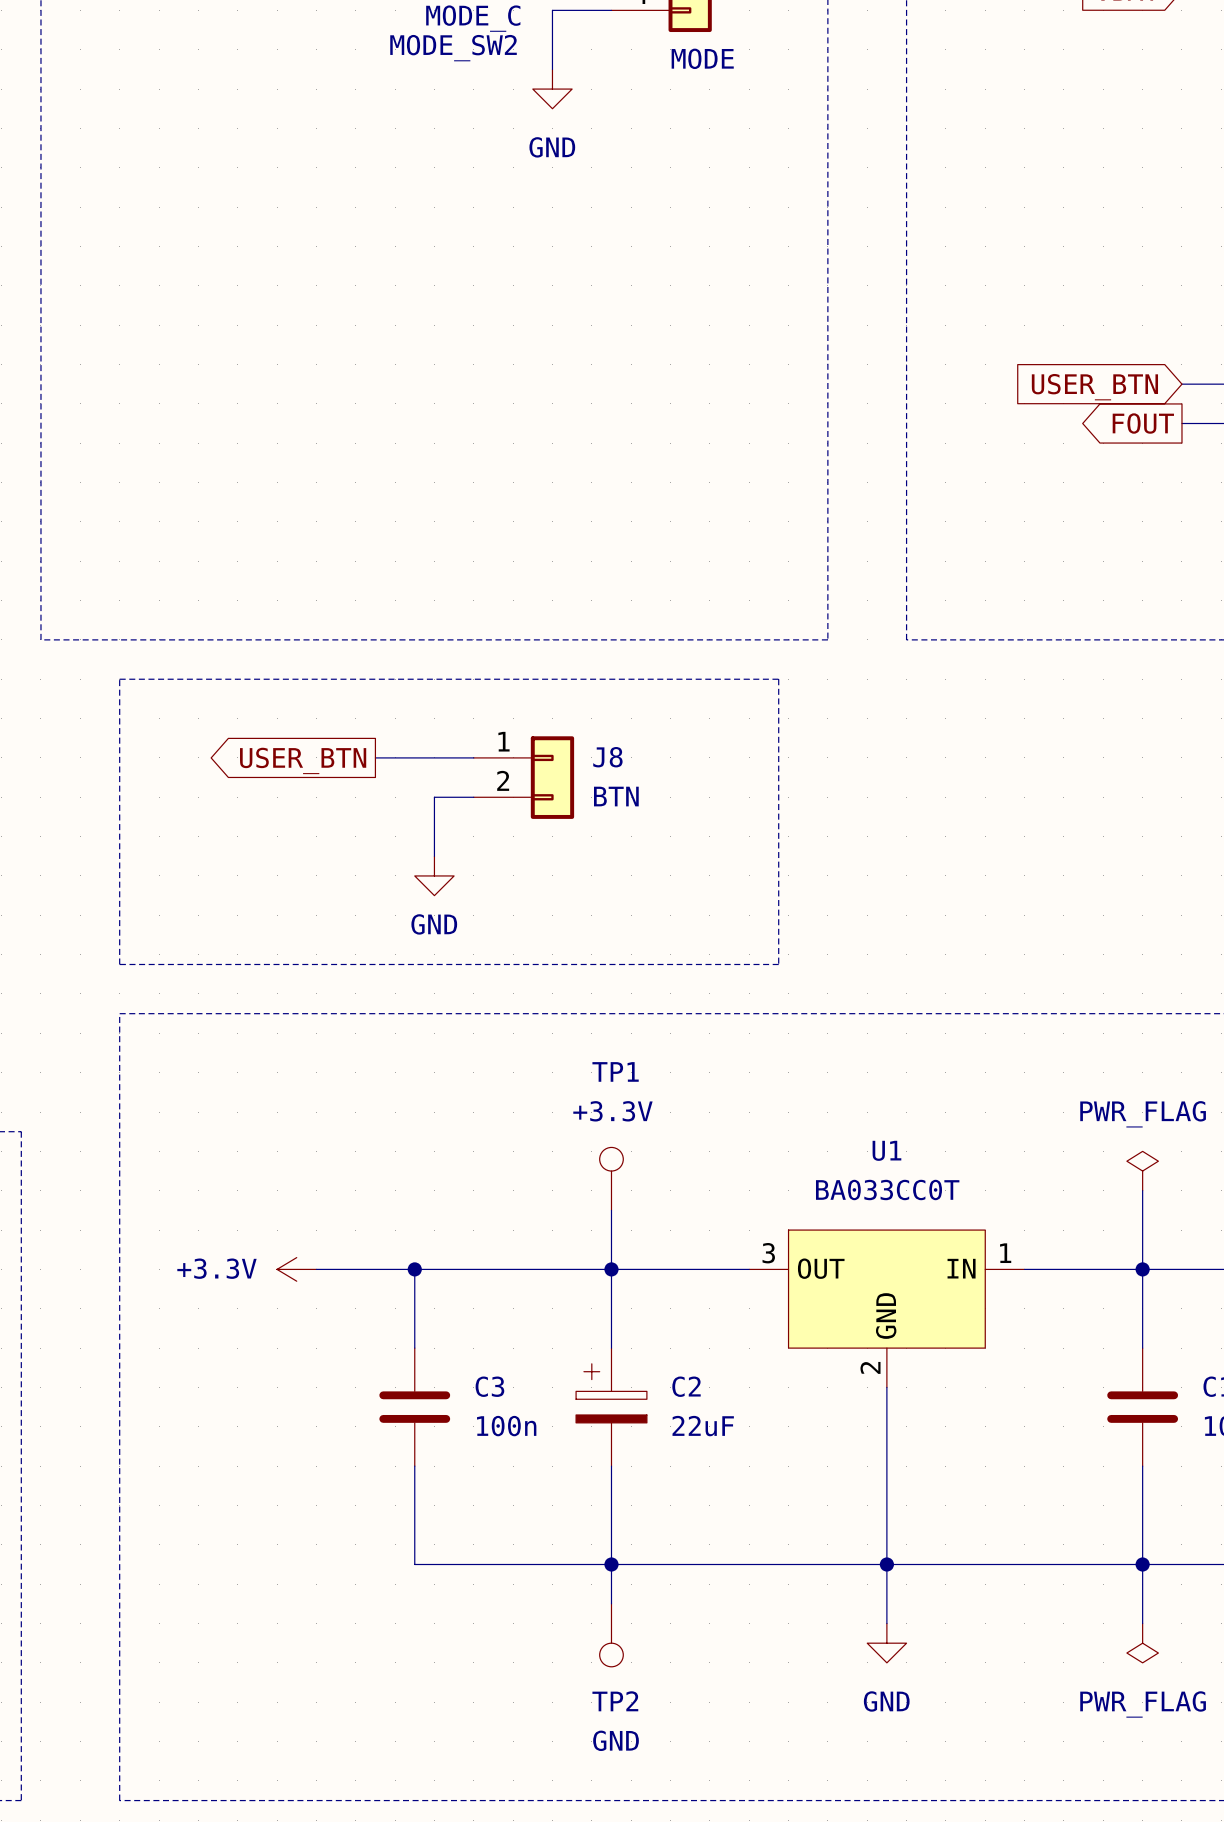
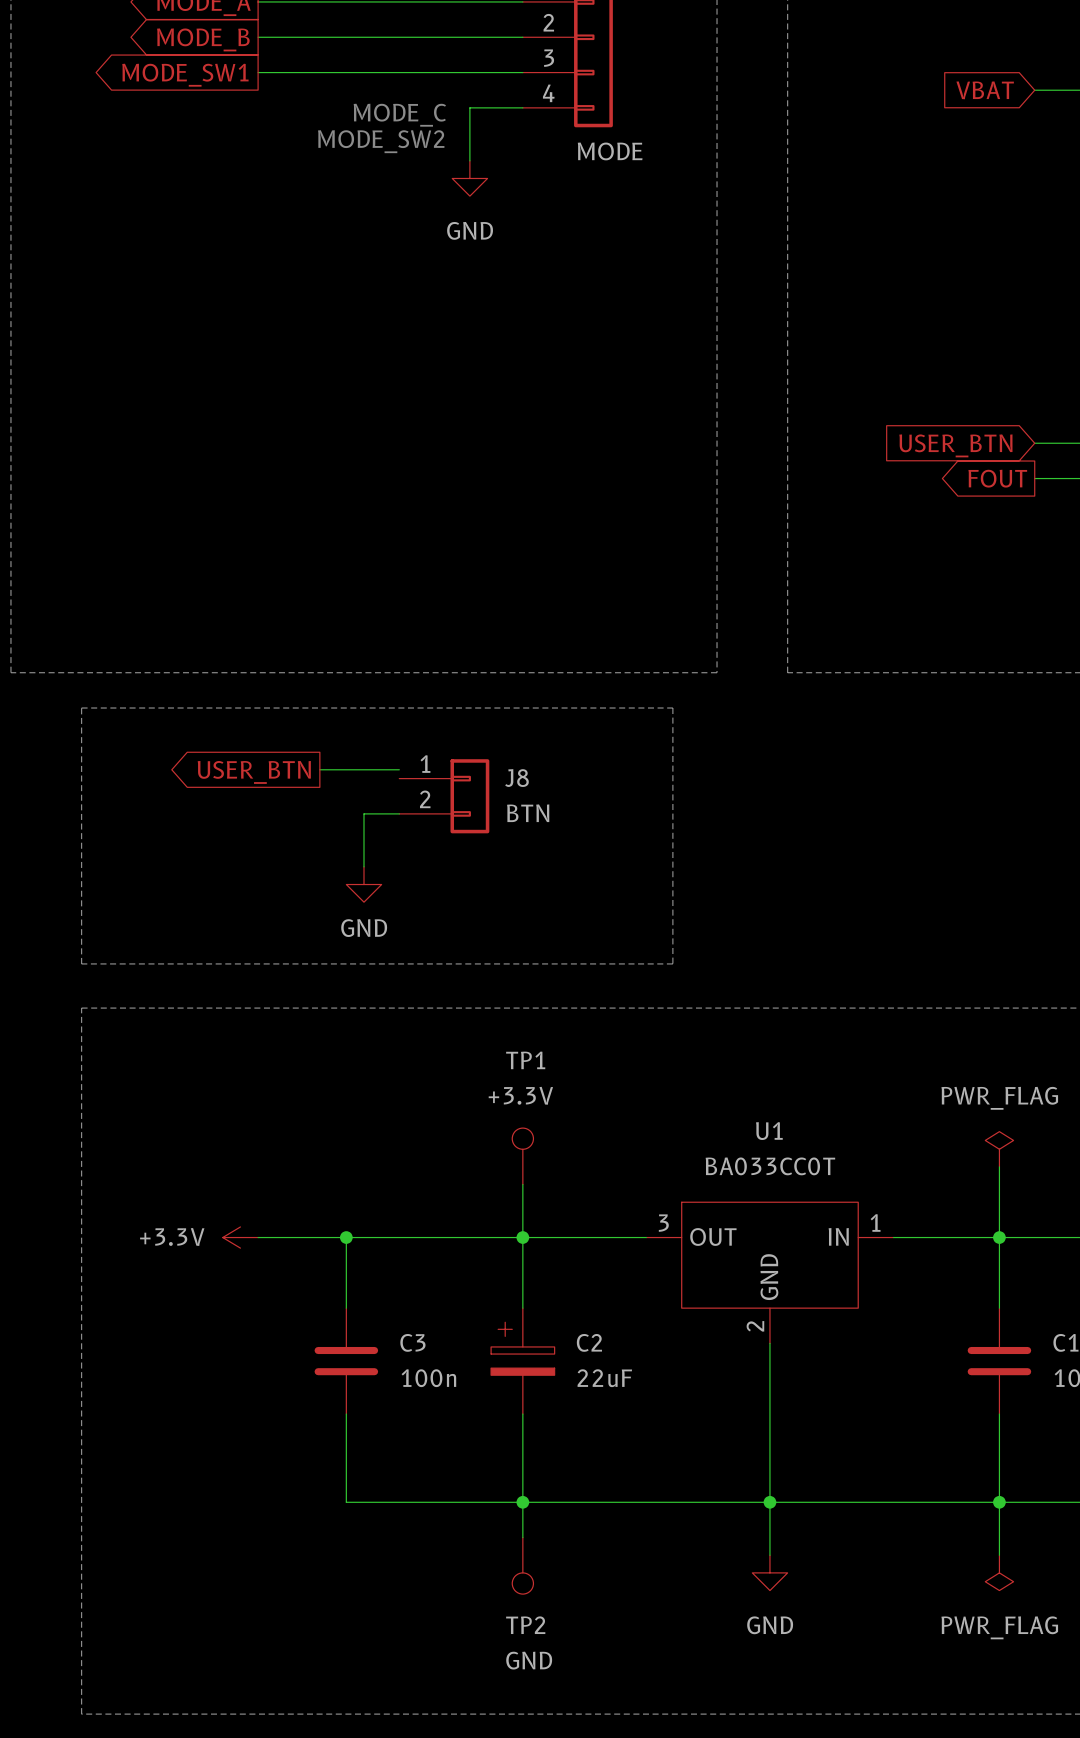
wire: none -> (319, 769) (399, 769)
wire: (375, 757) (473, 757) -> none
global label position: USER_BTN (303, 760) -> USER_BTN (254, 772)

